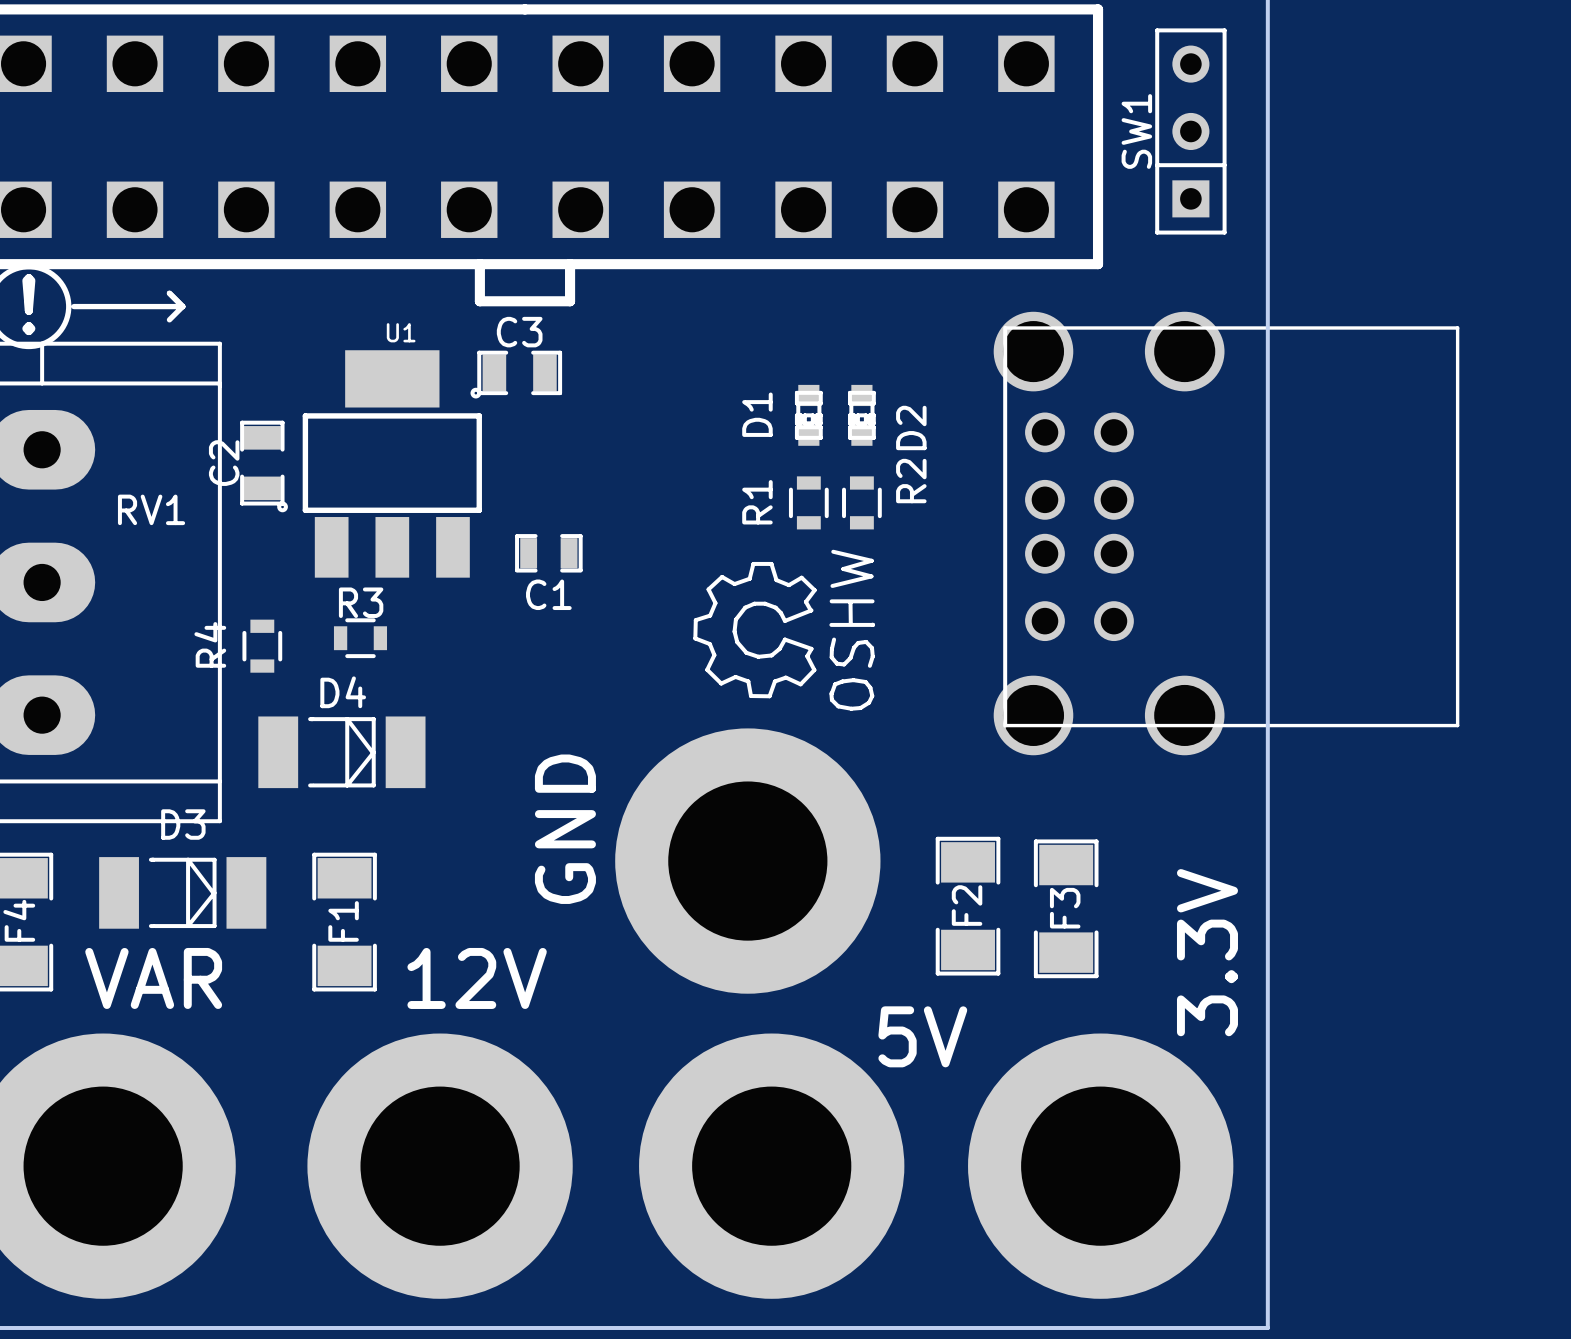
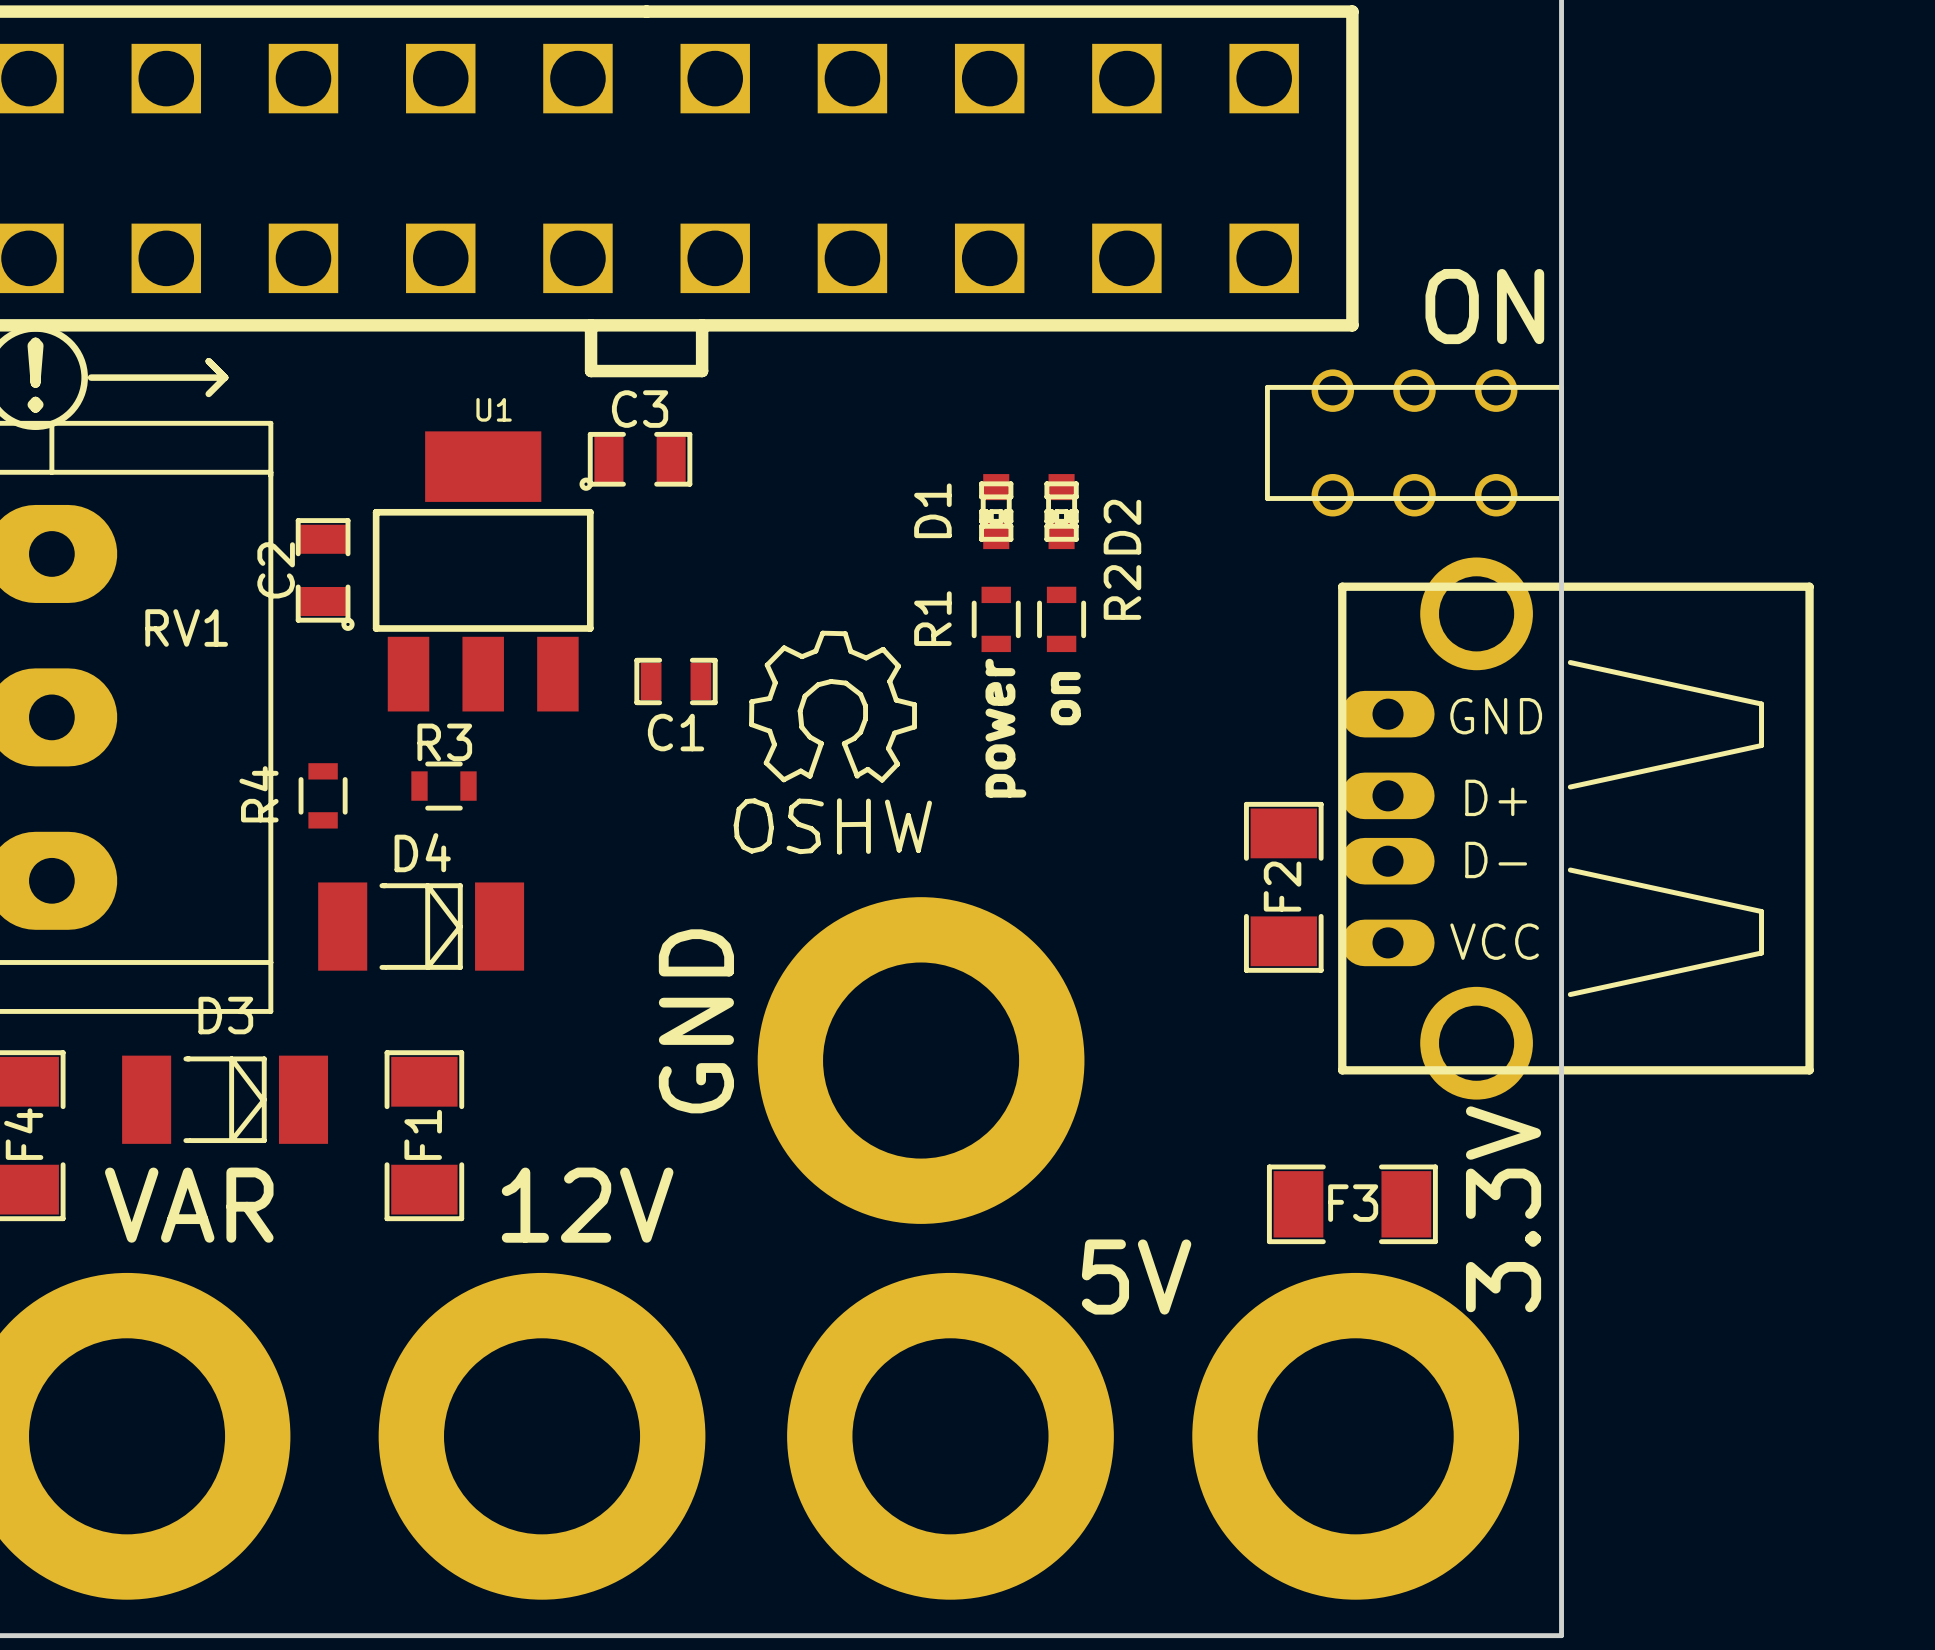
SW1: (1190, 131) -> none
text: none -> ON (1484, 306)
part: none -> (1414, 442)
drawing: none -> [733, 630, 932, 855]
part: (1226, 533) -> none
drawing: [693, 549, 876, 711] -> none
text: none -> on (1065, 698)
text: none -> power (1005, 728)
part: none -> (1575, 828)
F2 position: (968, 906) -> (1283, 887)
F3 rotation: 0° (1066, 908) -> 90° clockwise (1352, 1204)
text position: 3.3V (1207, 952) -> 3.3V (1503, 1209)

